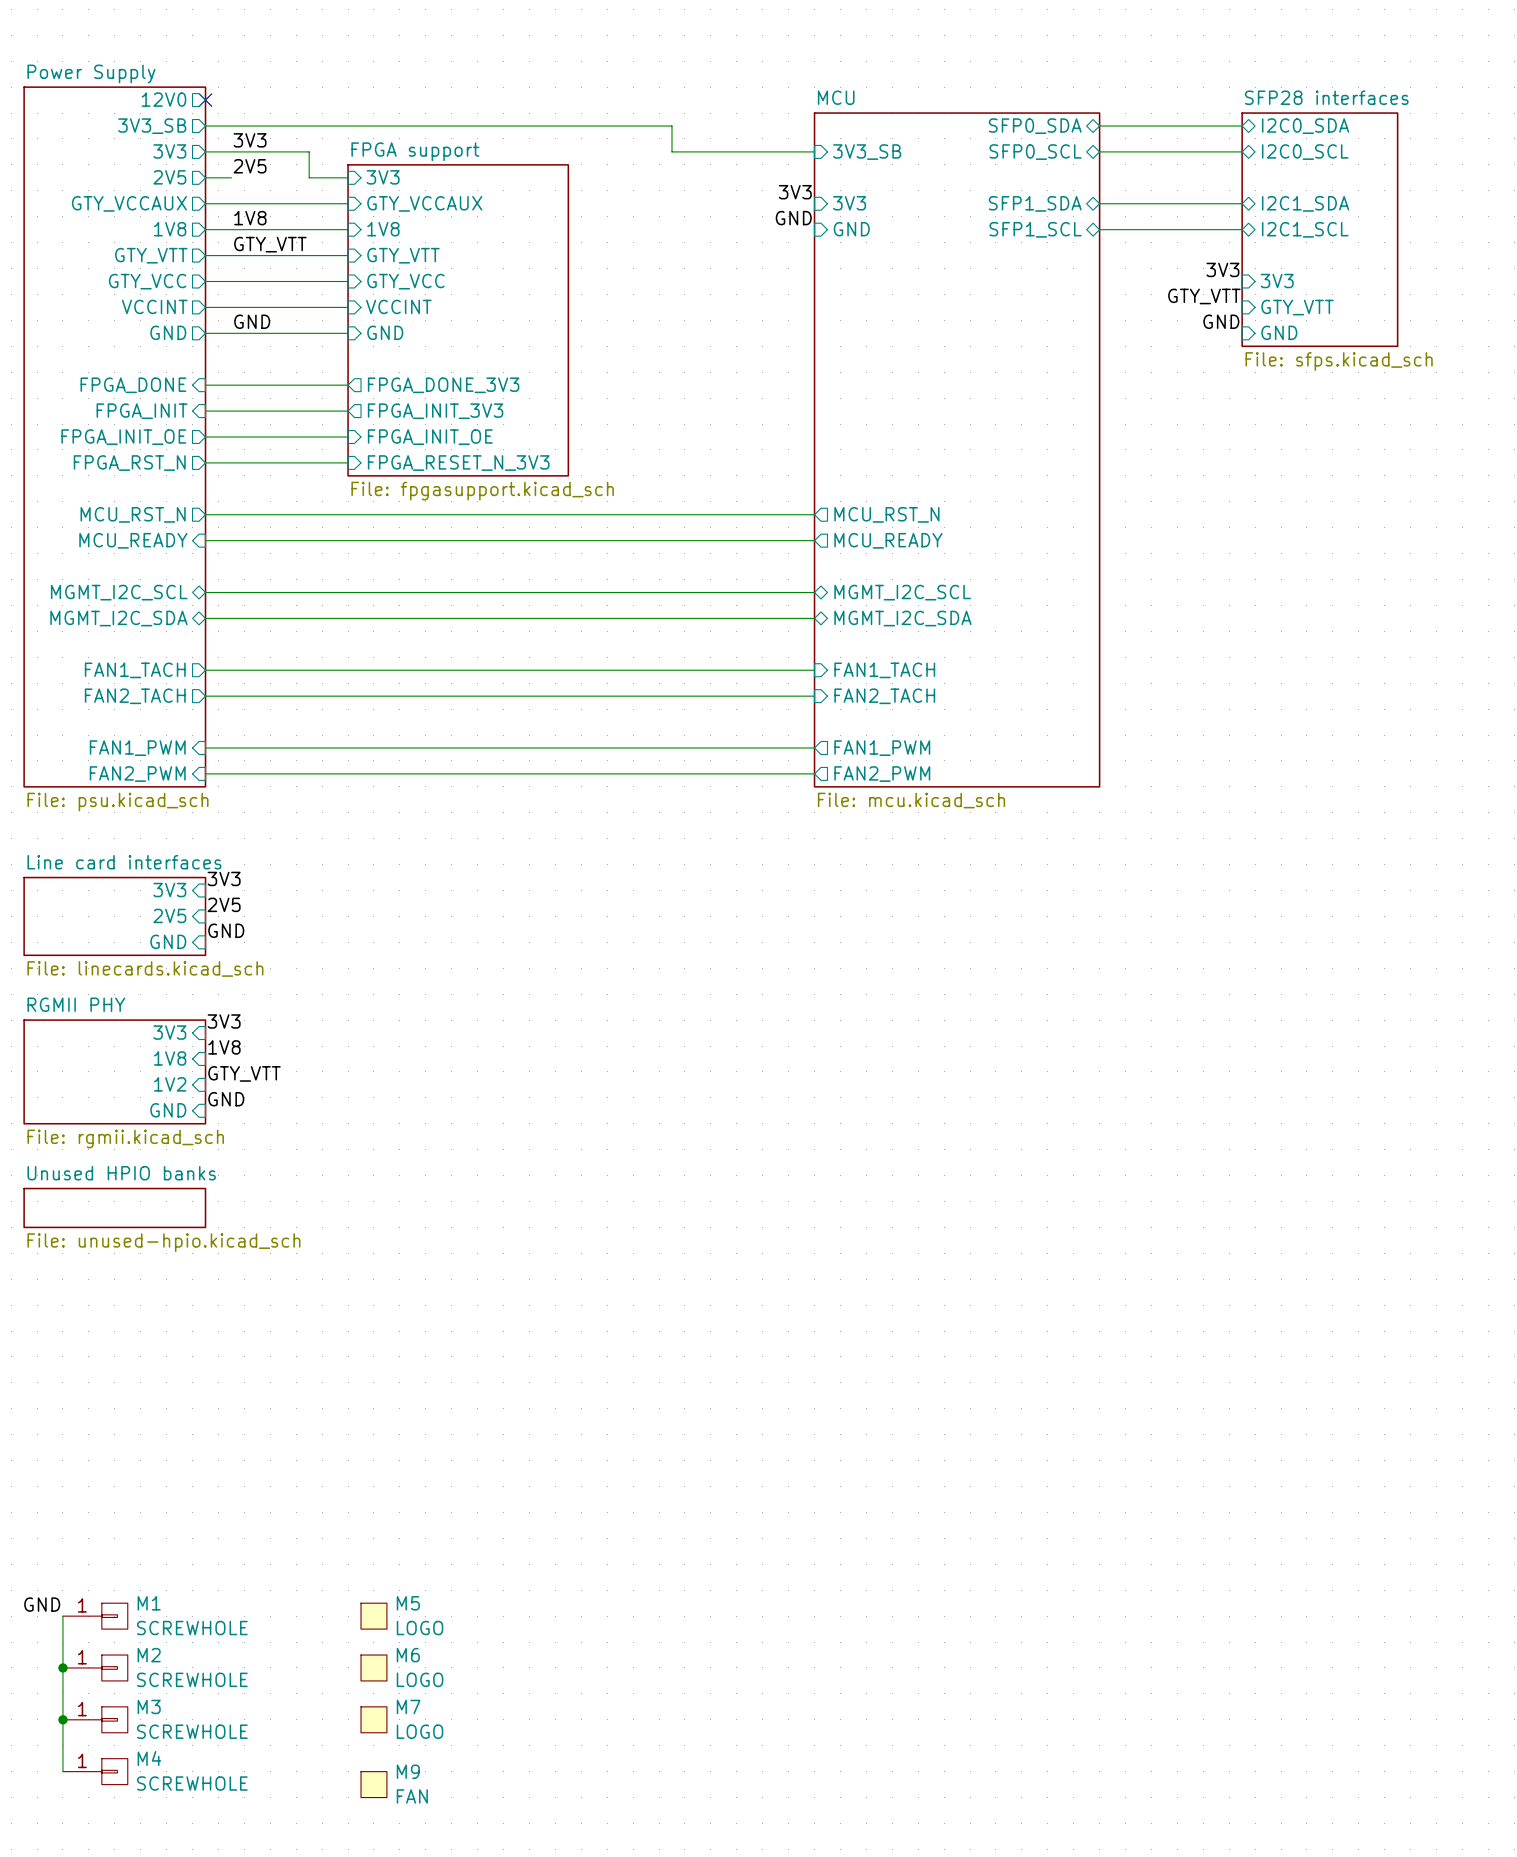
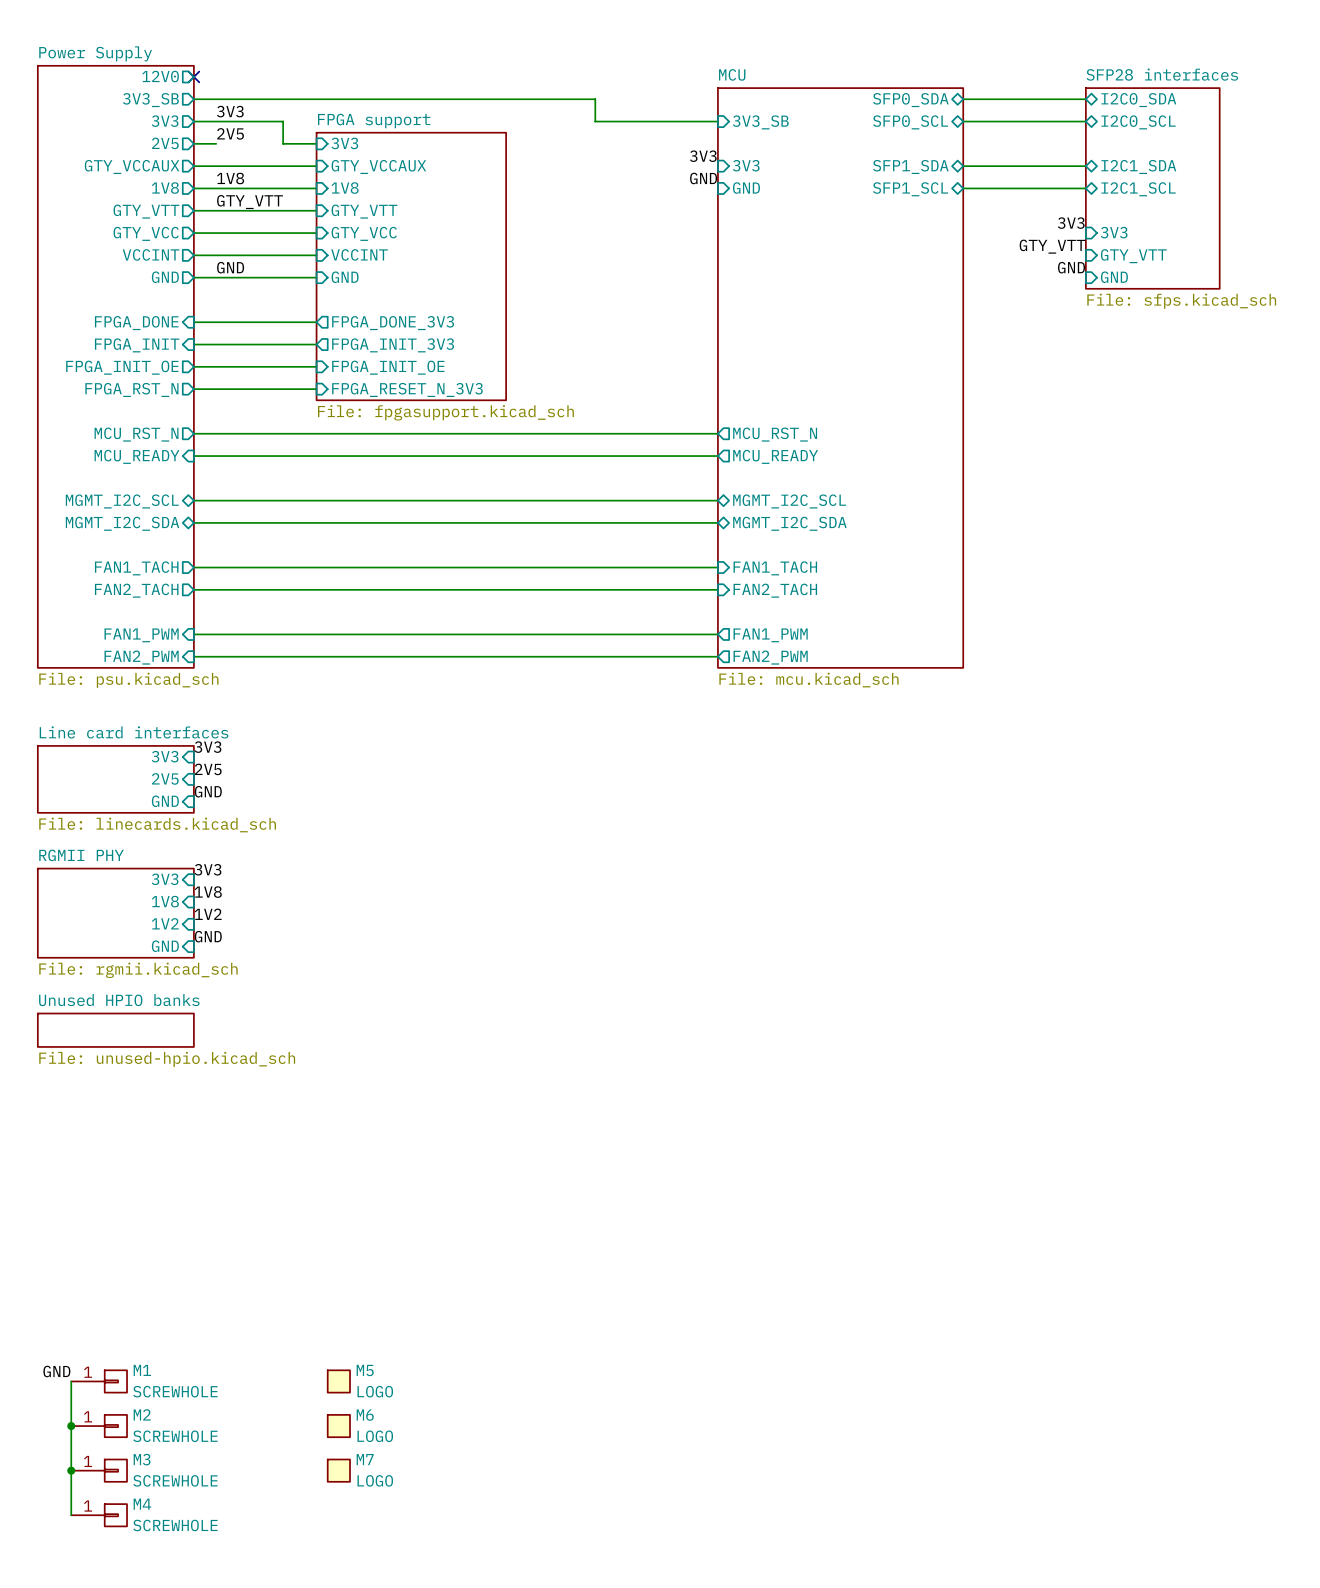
label: GTY_VTT (244, 1073) -> 1V2 (208, 914)
M9: FAN (373, 1784) -> none

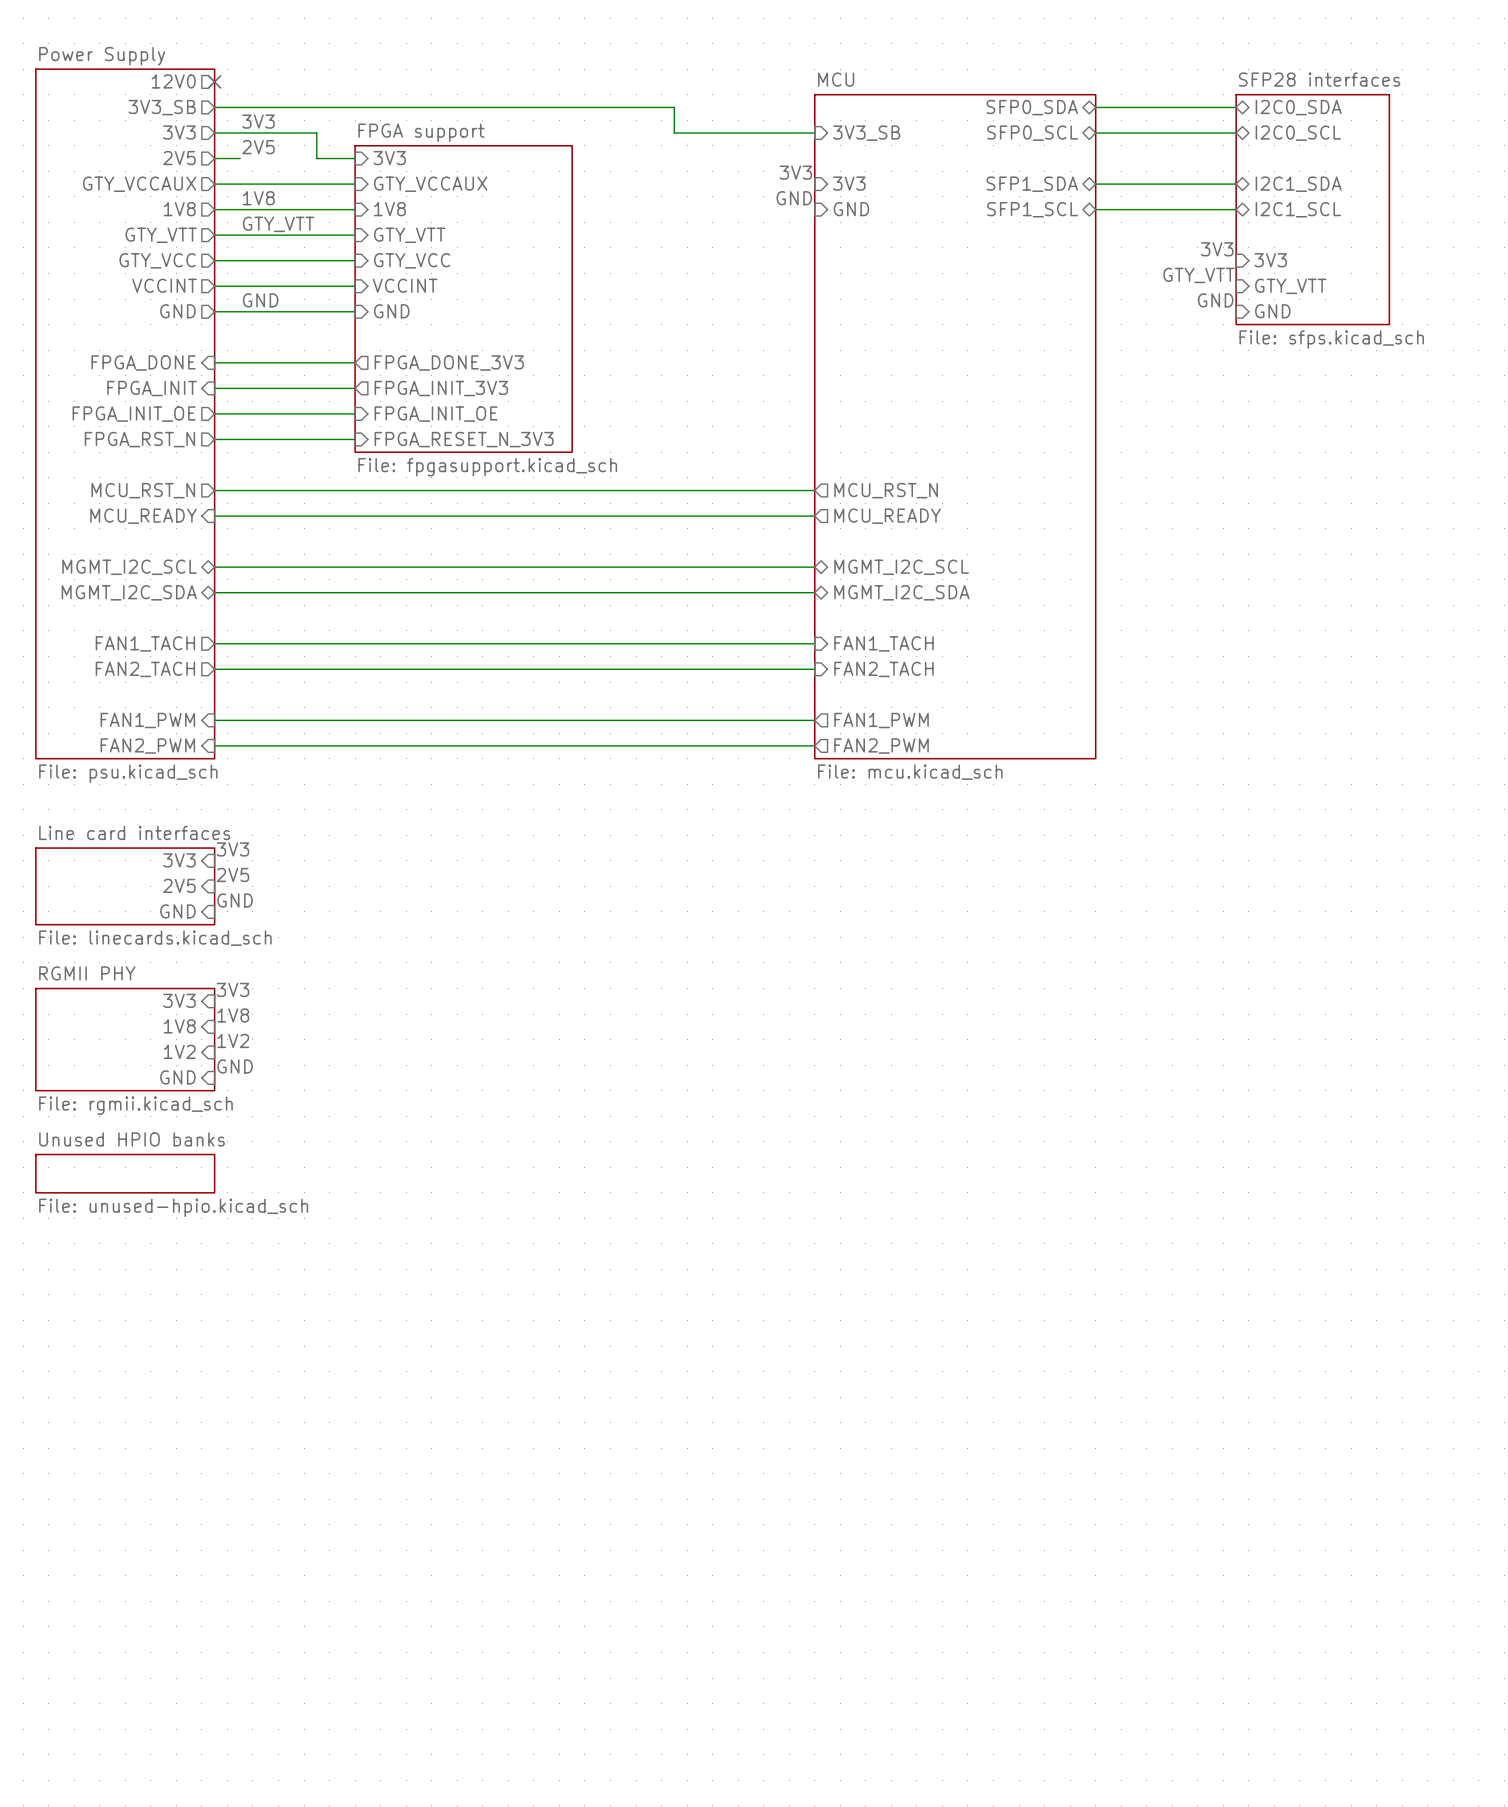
label: GND (56, 1371) -> none
wire: (71, 1381) (71, 1515) -> none
M1: SCREWHOLE (99, 1381) -> none
M5: LOGO (338, 1381) -> none
junction: (71, 1426) -> none
M2: SCREWHOLE (99, 1426) -> none
M6: LOGO (338, 1426) -> none
junction: (71, 1470) -> none
M3: SCREWHOLE (99, 1470) -> none
M7: LOGO (338, 1470) -> none
M4: SCREWHOLE (99, 1515) -> none

